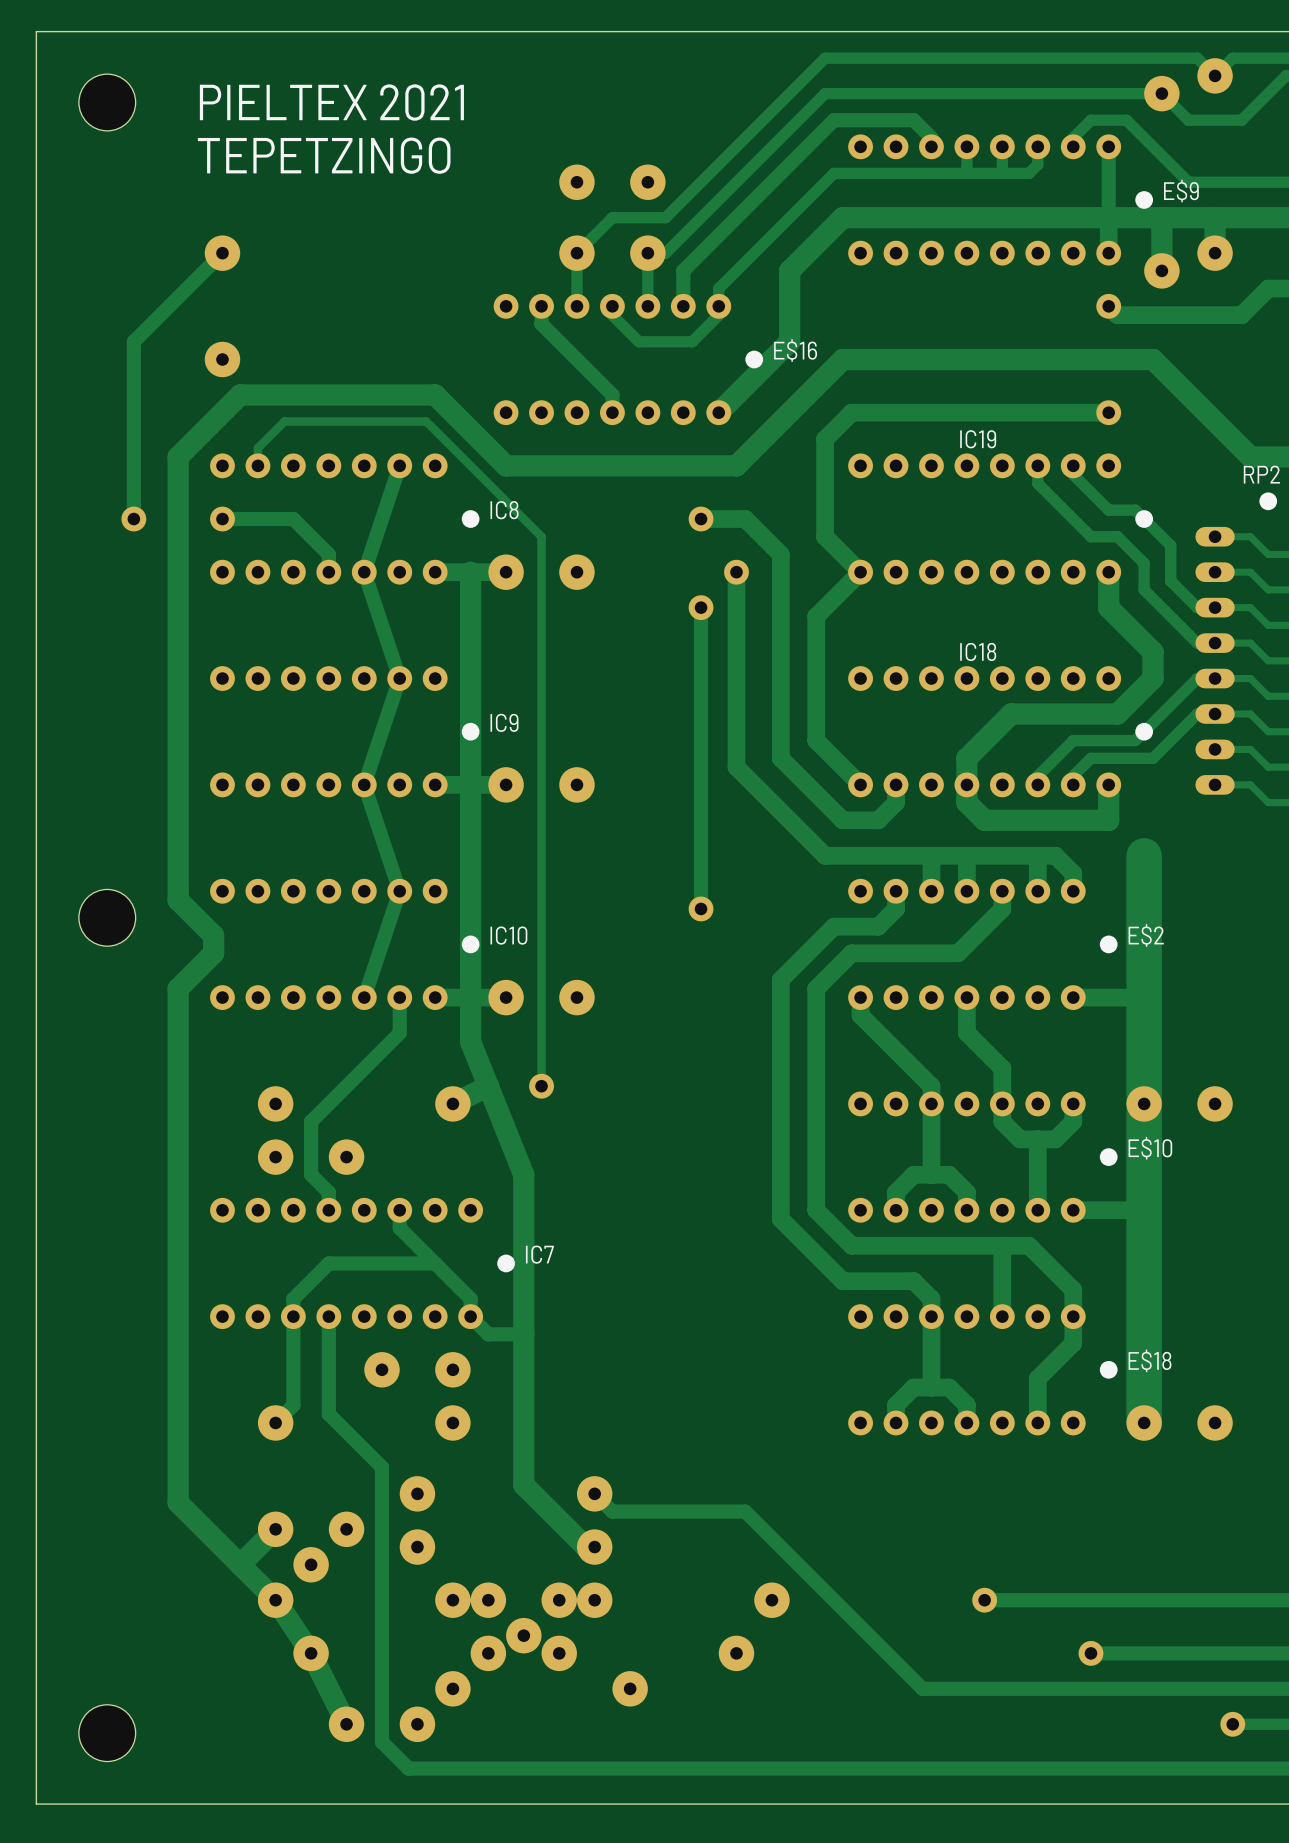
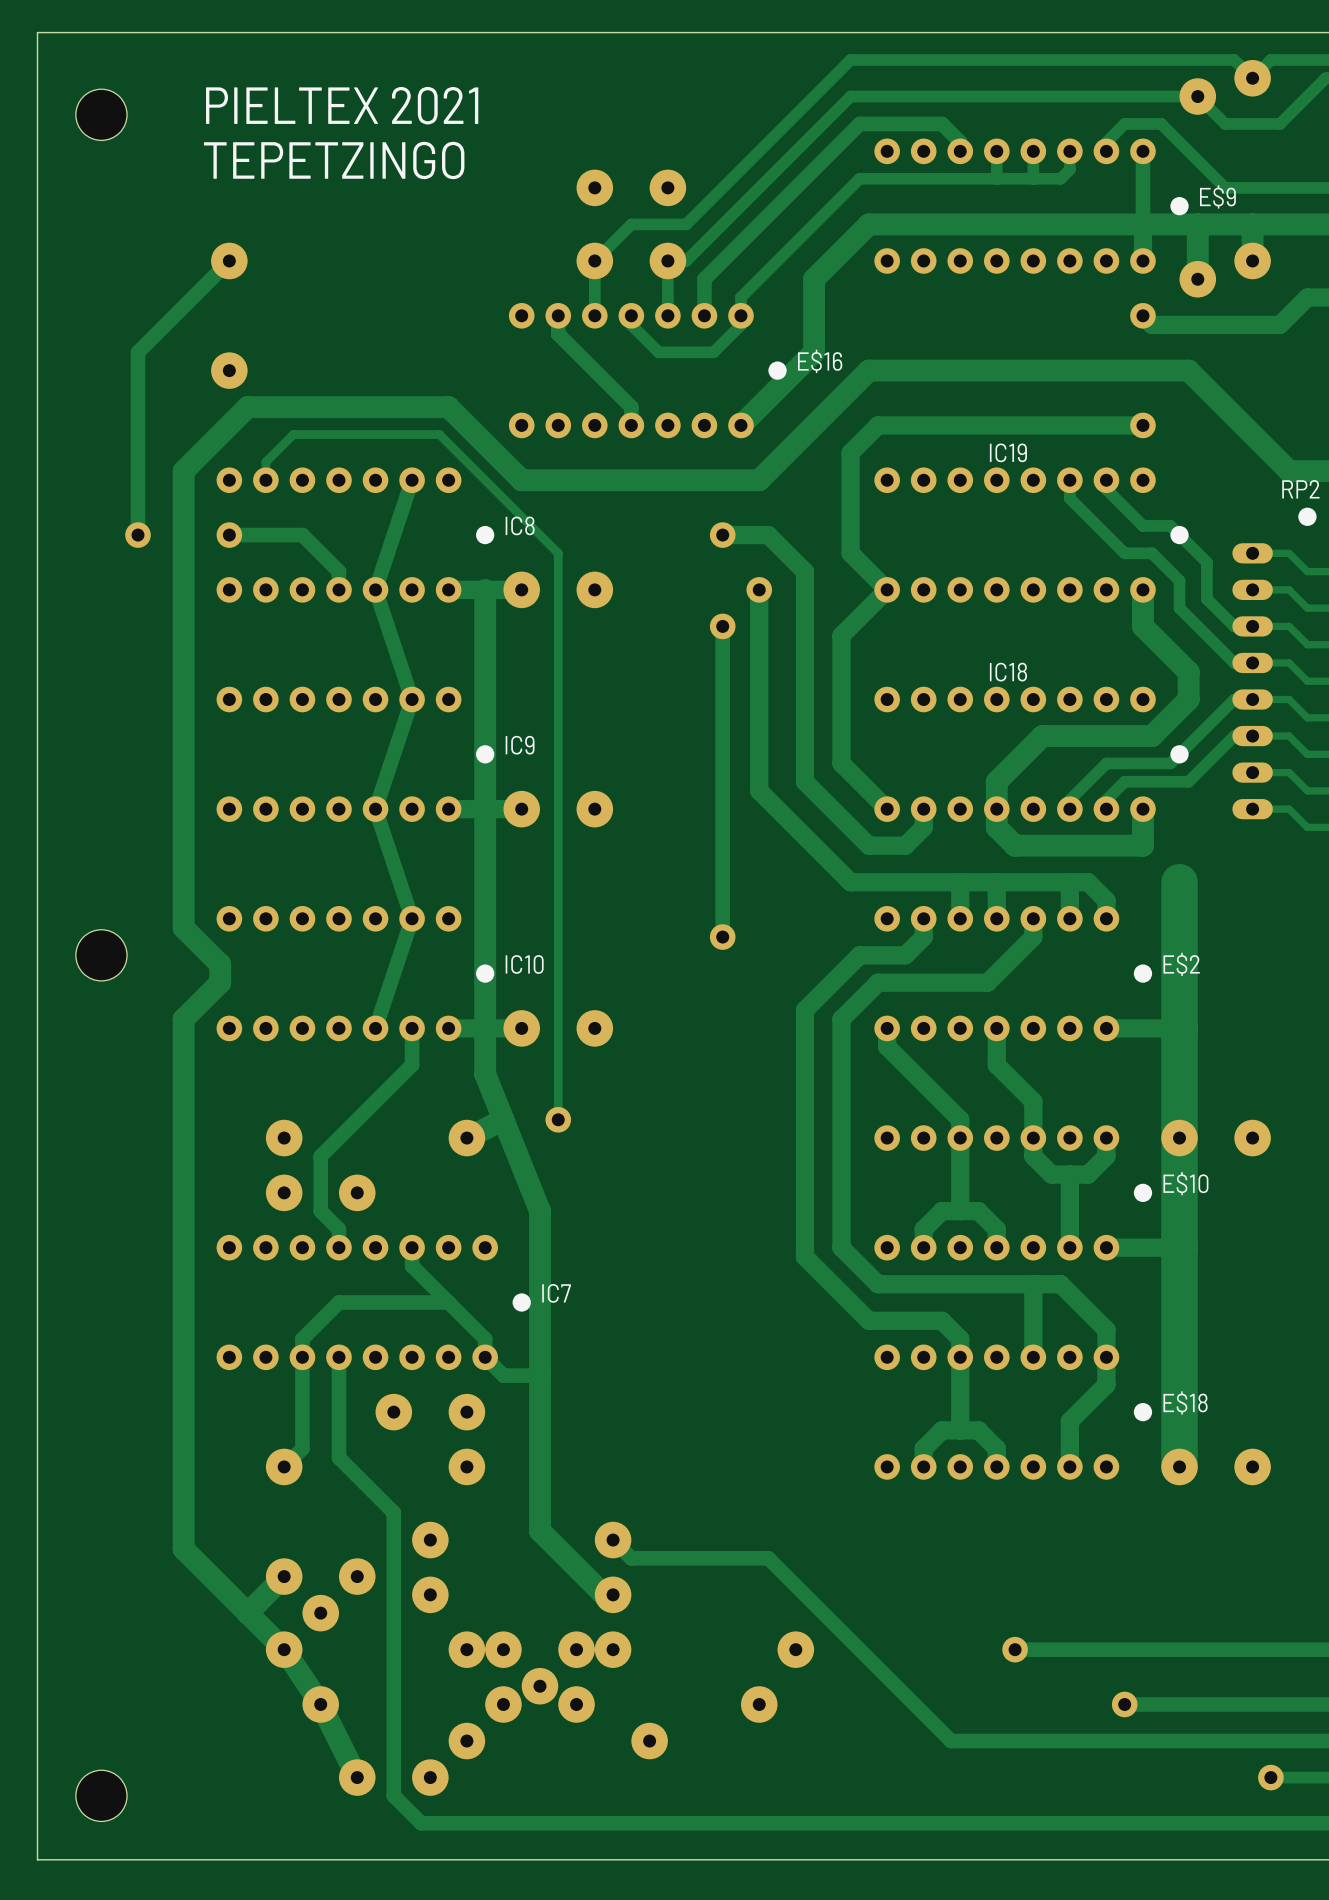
hole size: [78, 74, 136, 131] -> [75, 89, 128, 141]
hole size: [78, 889, 136, 947] -> [75, 929, 128, 981]
hole size: [78, 1704, 136, 1762] -> [75, 1770, 128, 1822]

